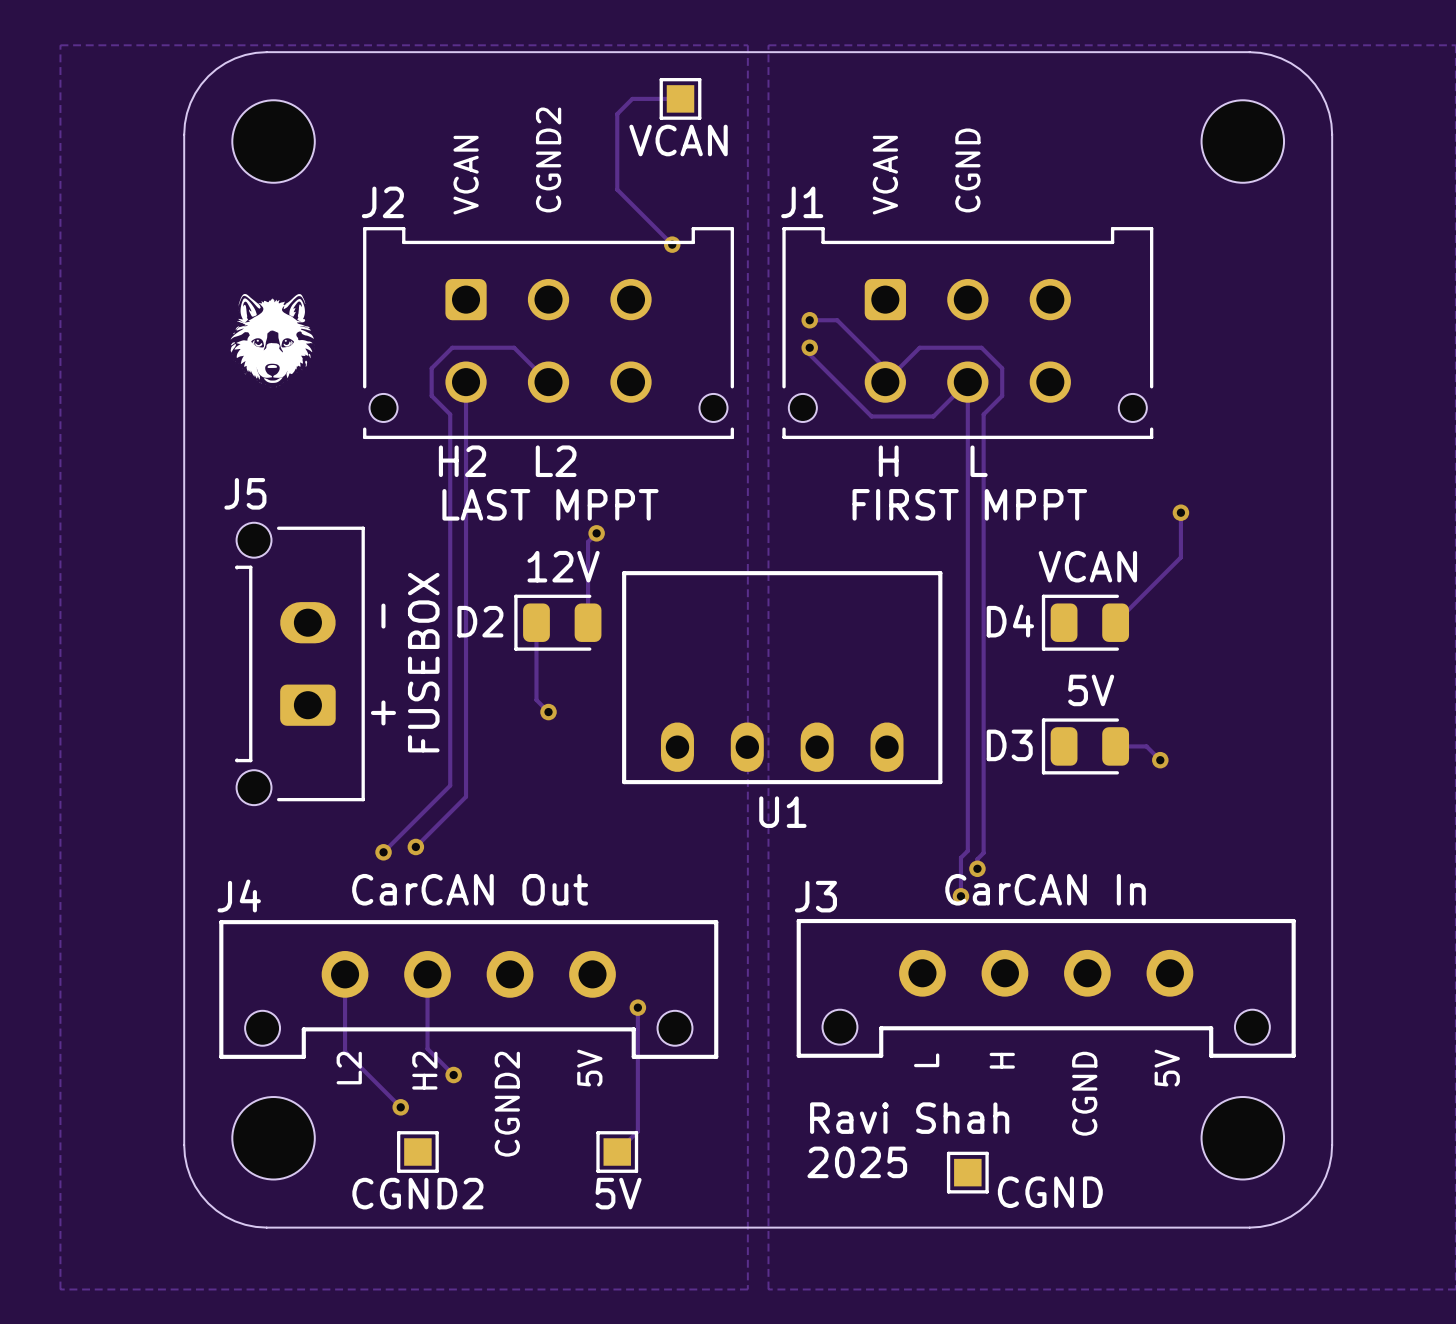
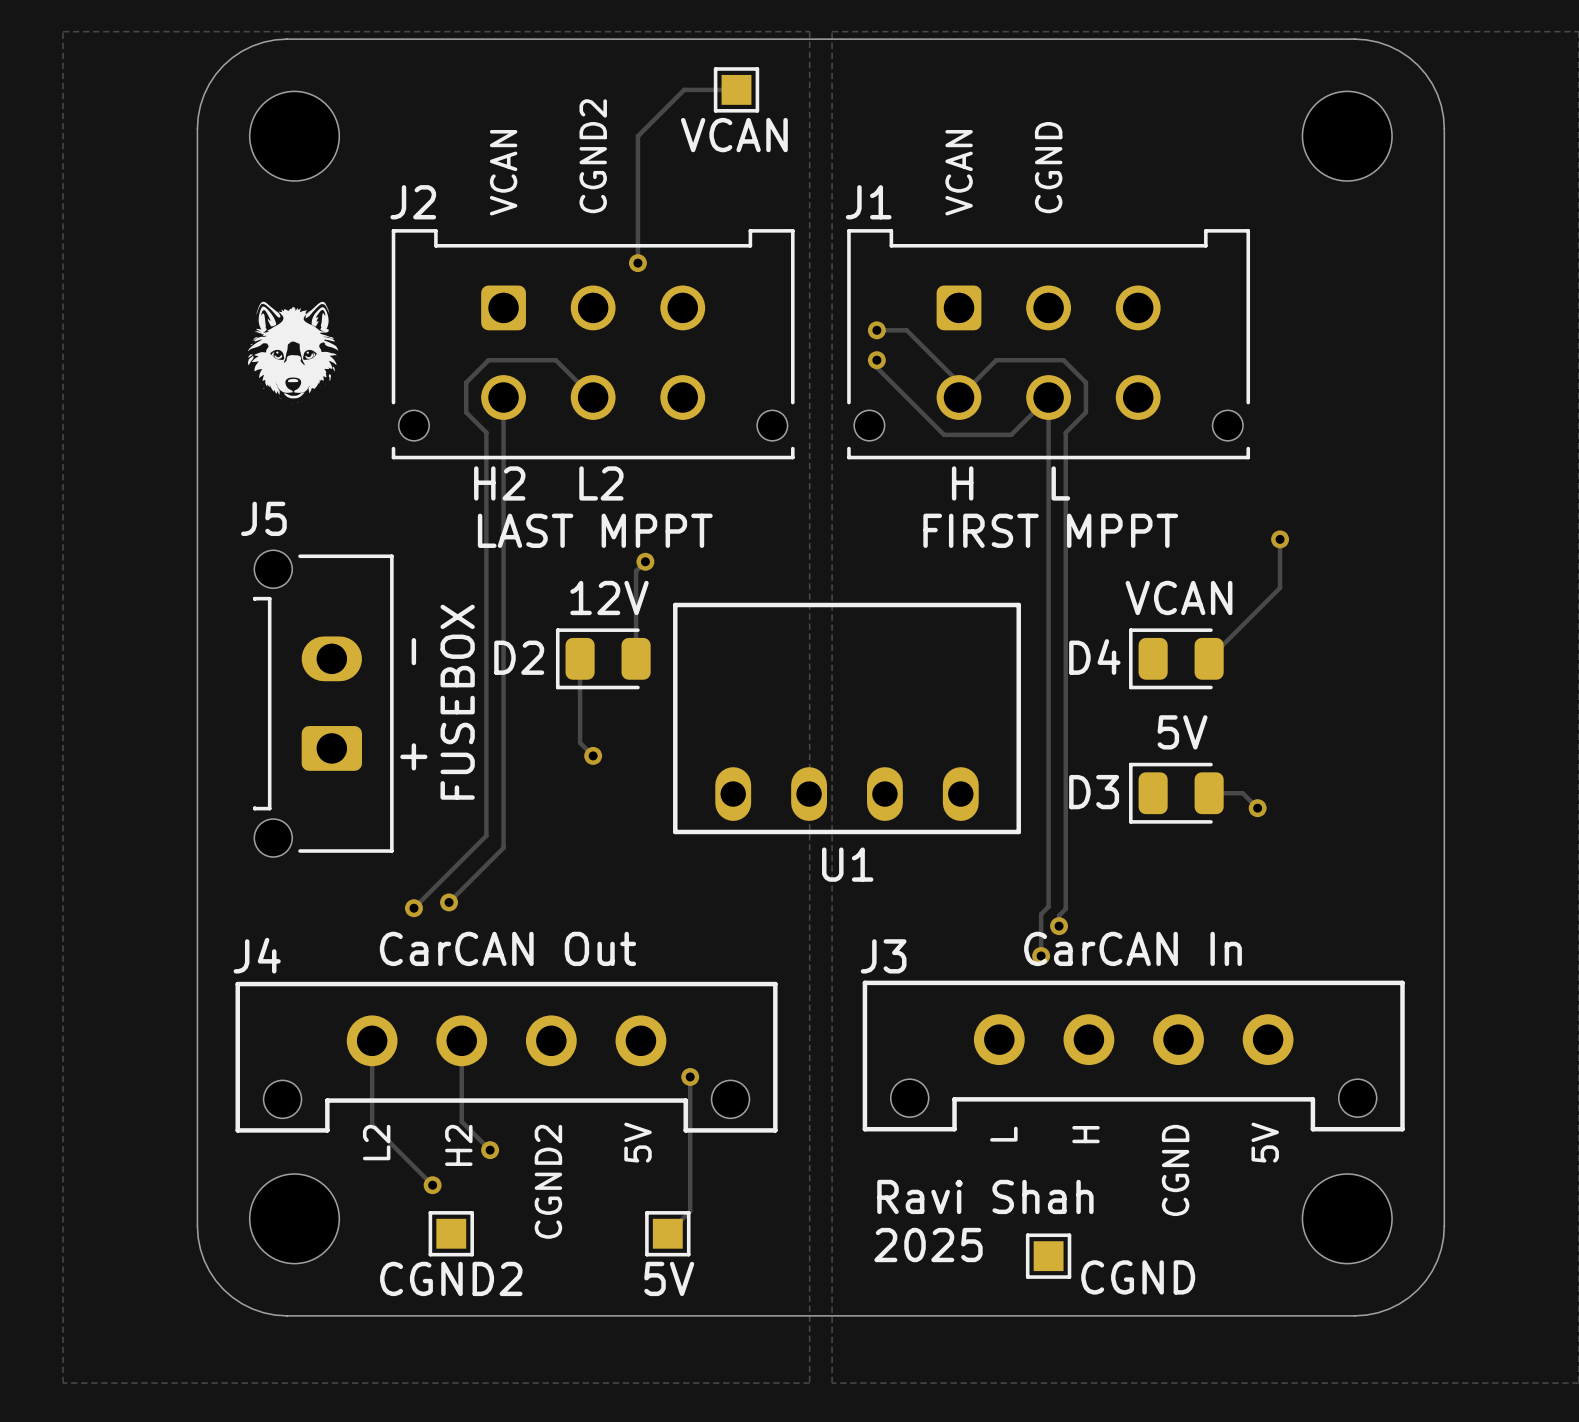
track: (617, 114) (617, 189) (672, 244) -> (667, 106) (637, 136) (637, 263)
via position: (672, 244) -> (637, 263)

